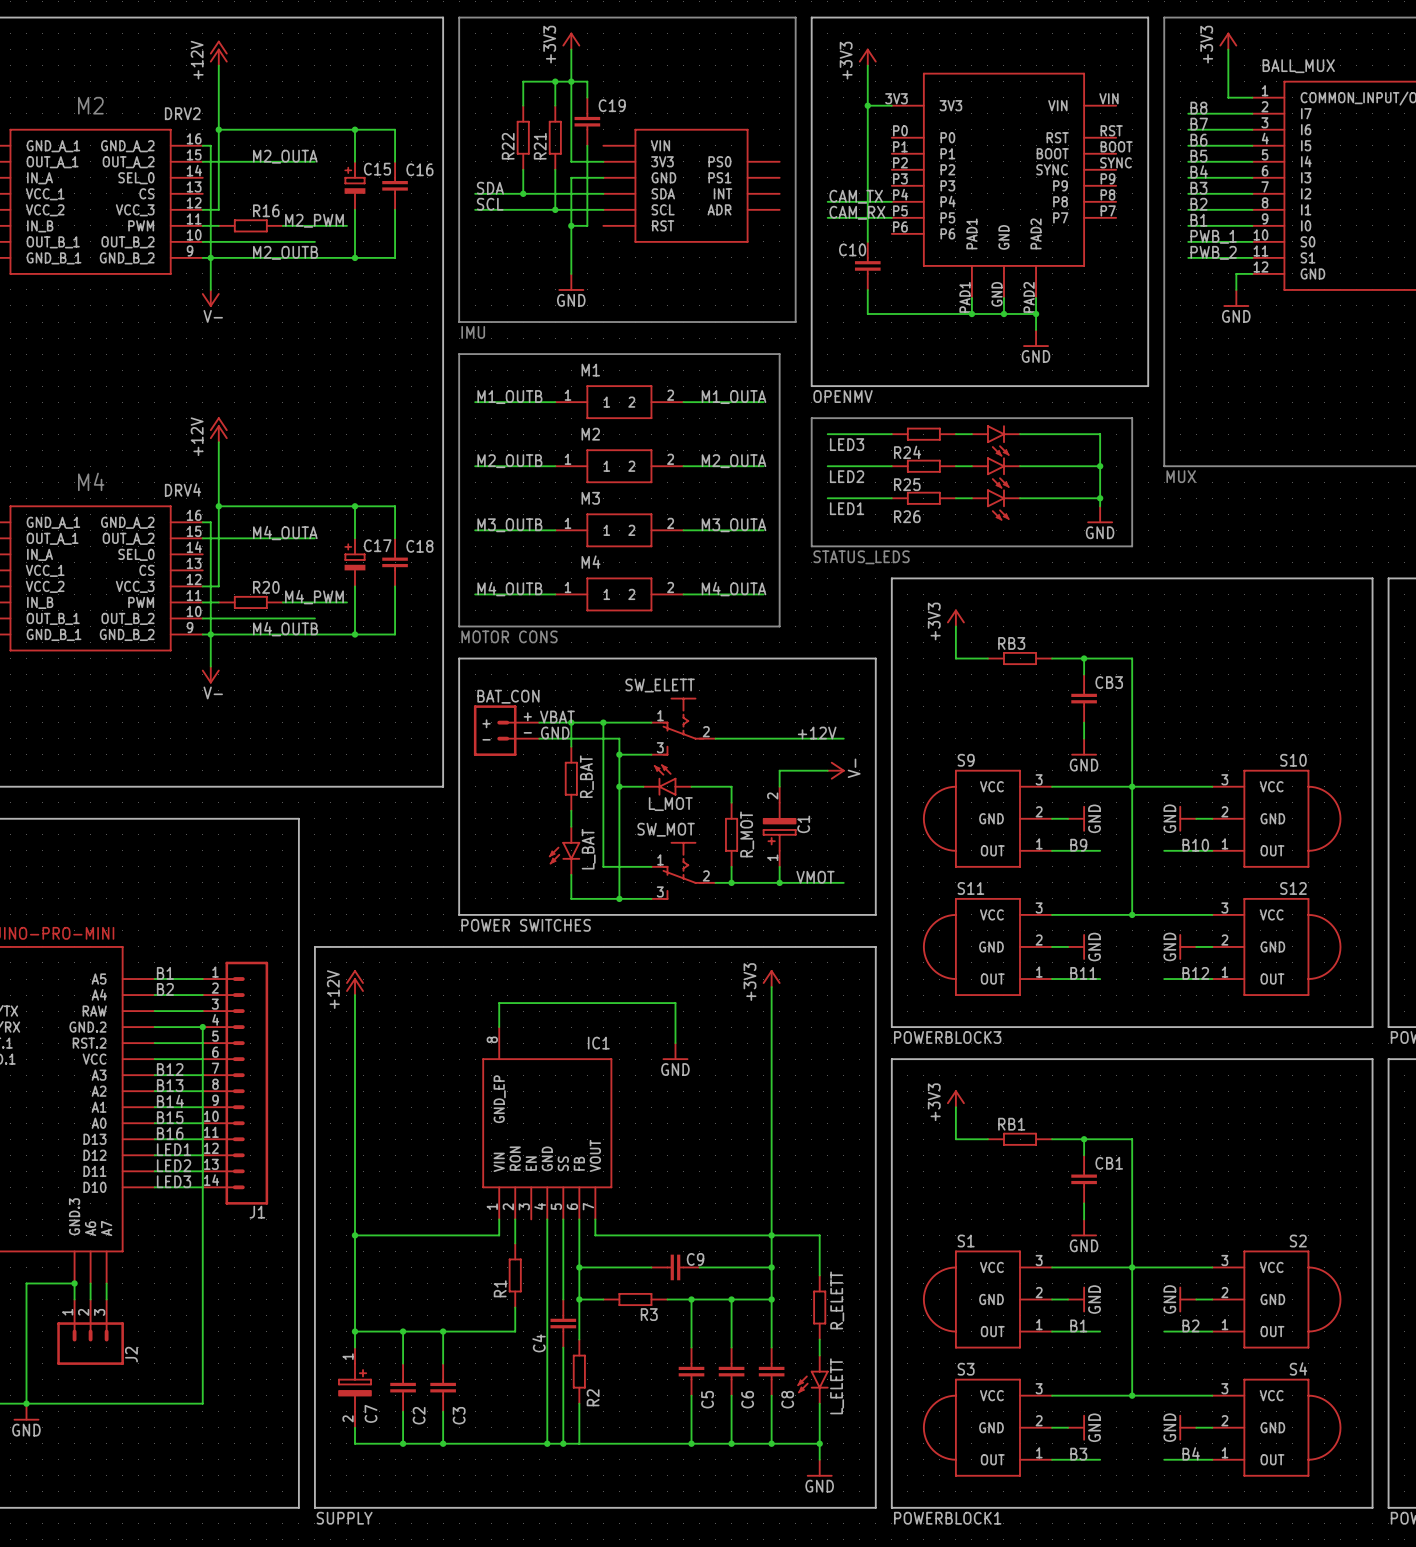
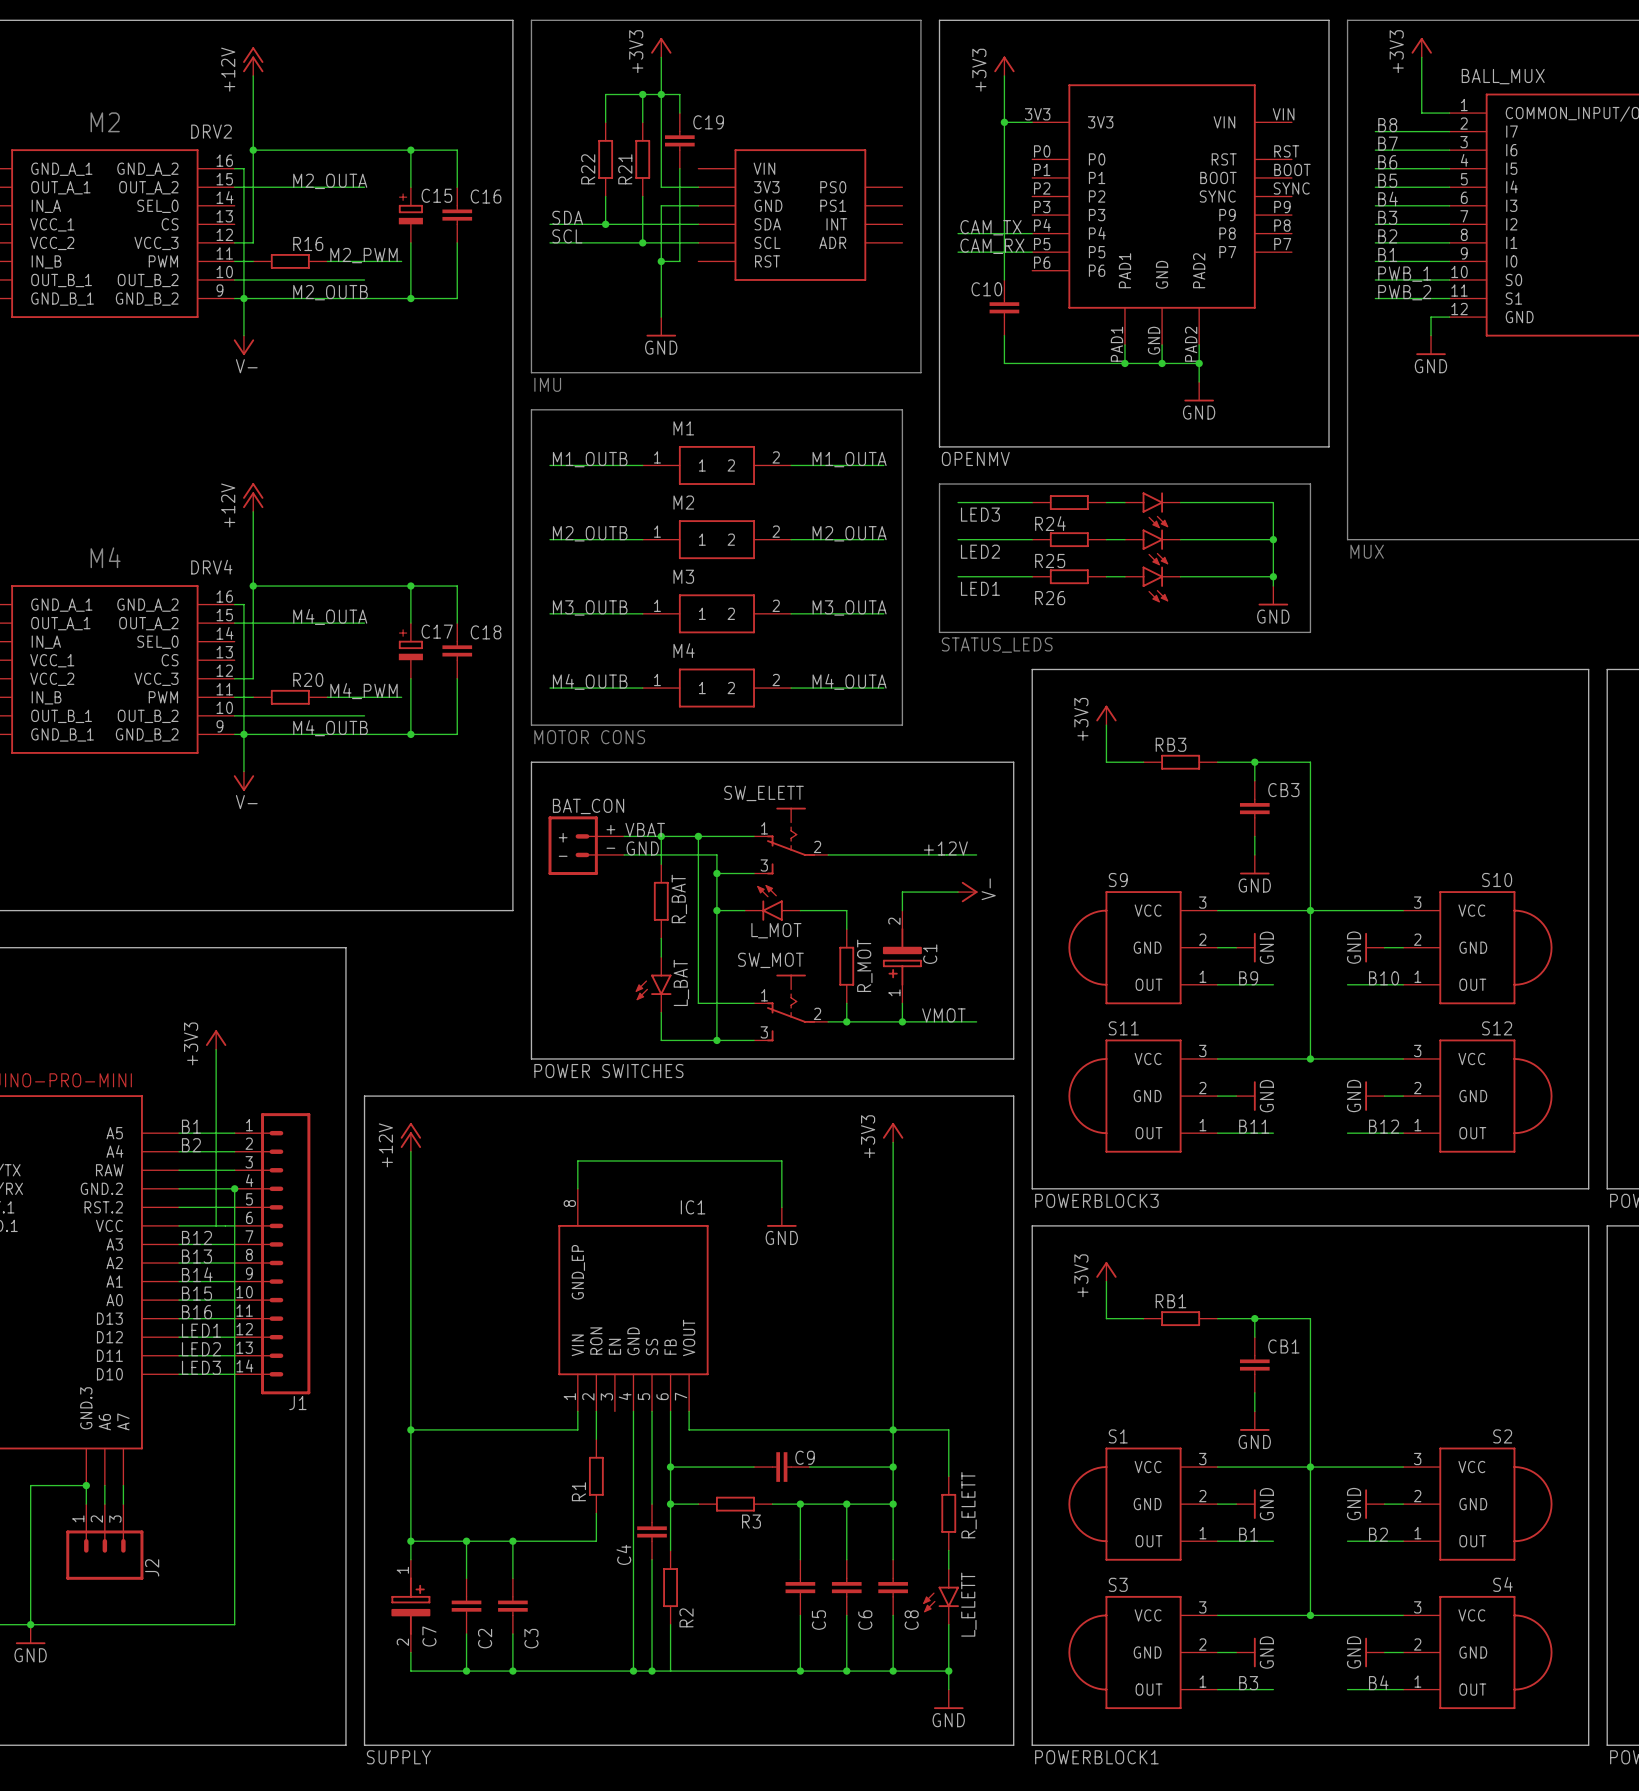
power symbol: none -> +3V3 (216, 1039)
wire: none -> (216, 1049) (216, 1225)

